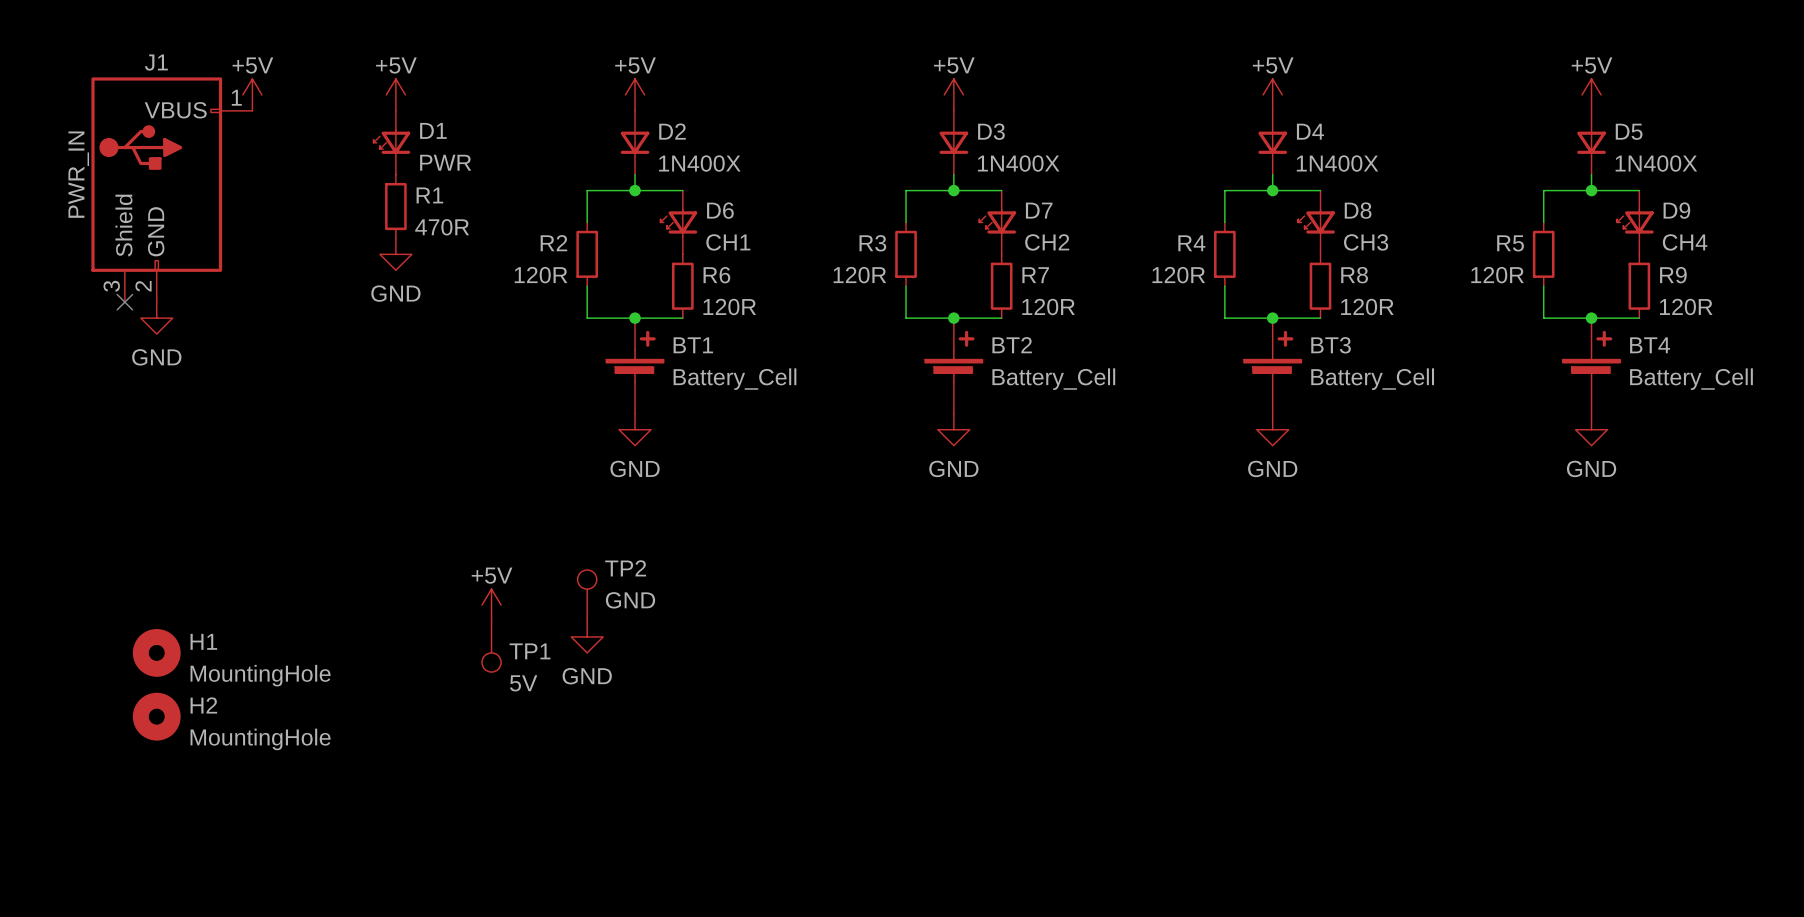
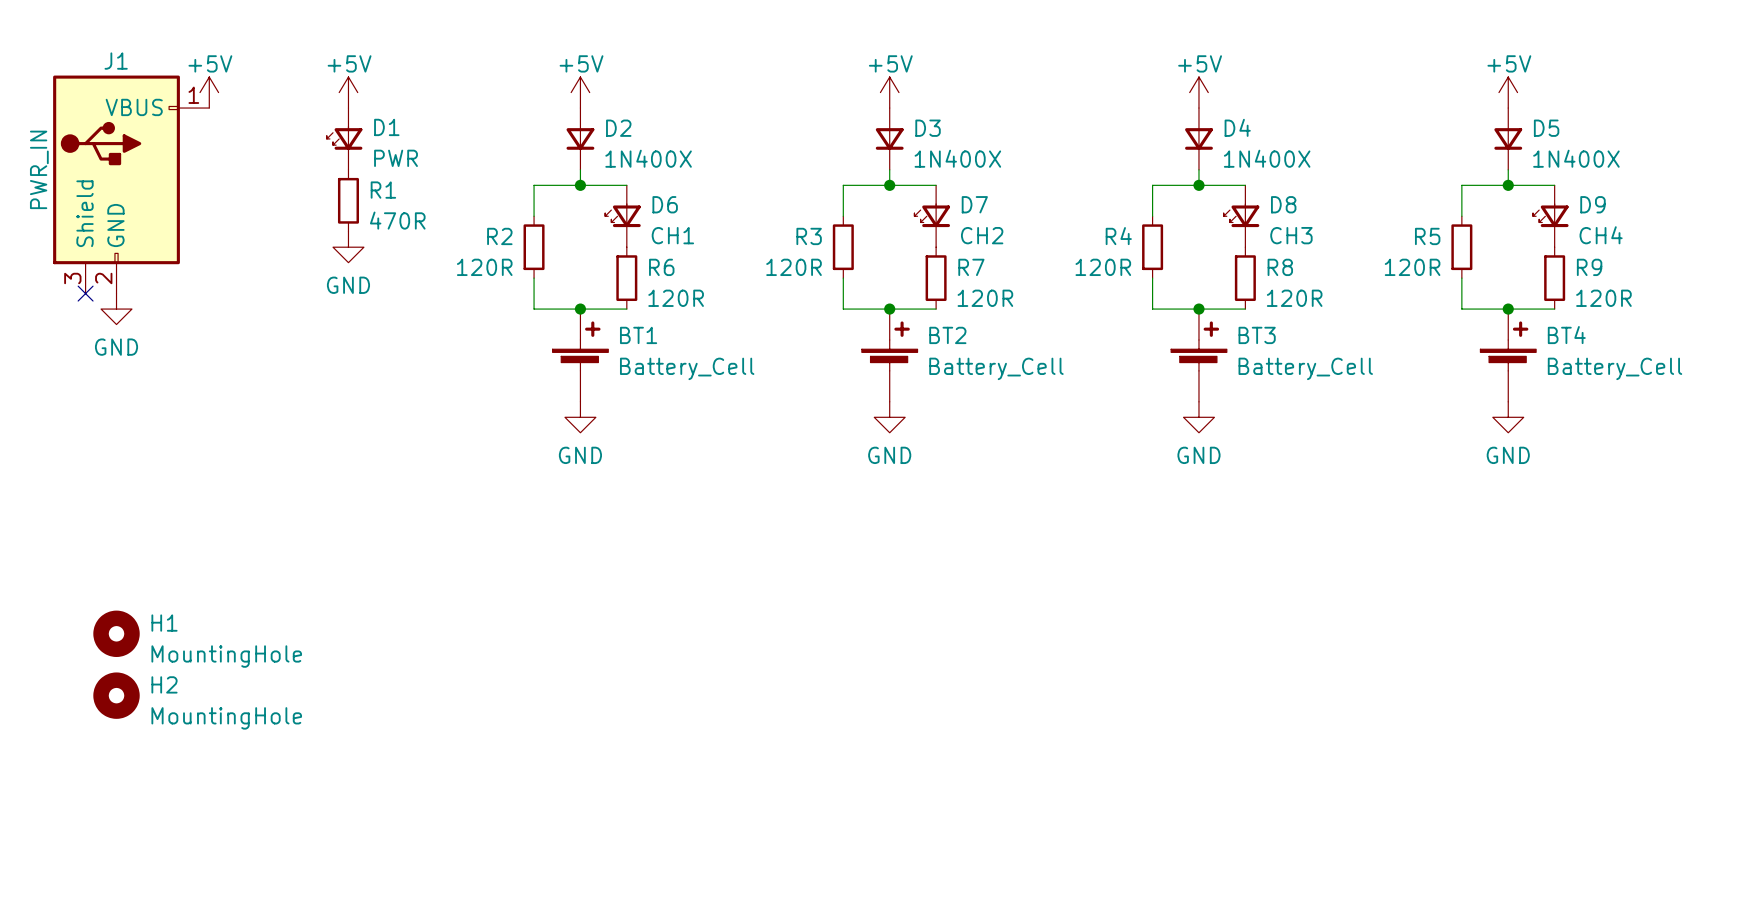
TP2: GND (587, 595) -> none
power symbol: +5V (491, 605) -> none
power symbol: GND (587, 636) -> none
TP1: 5V (491, 646) -> none

